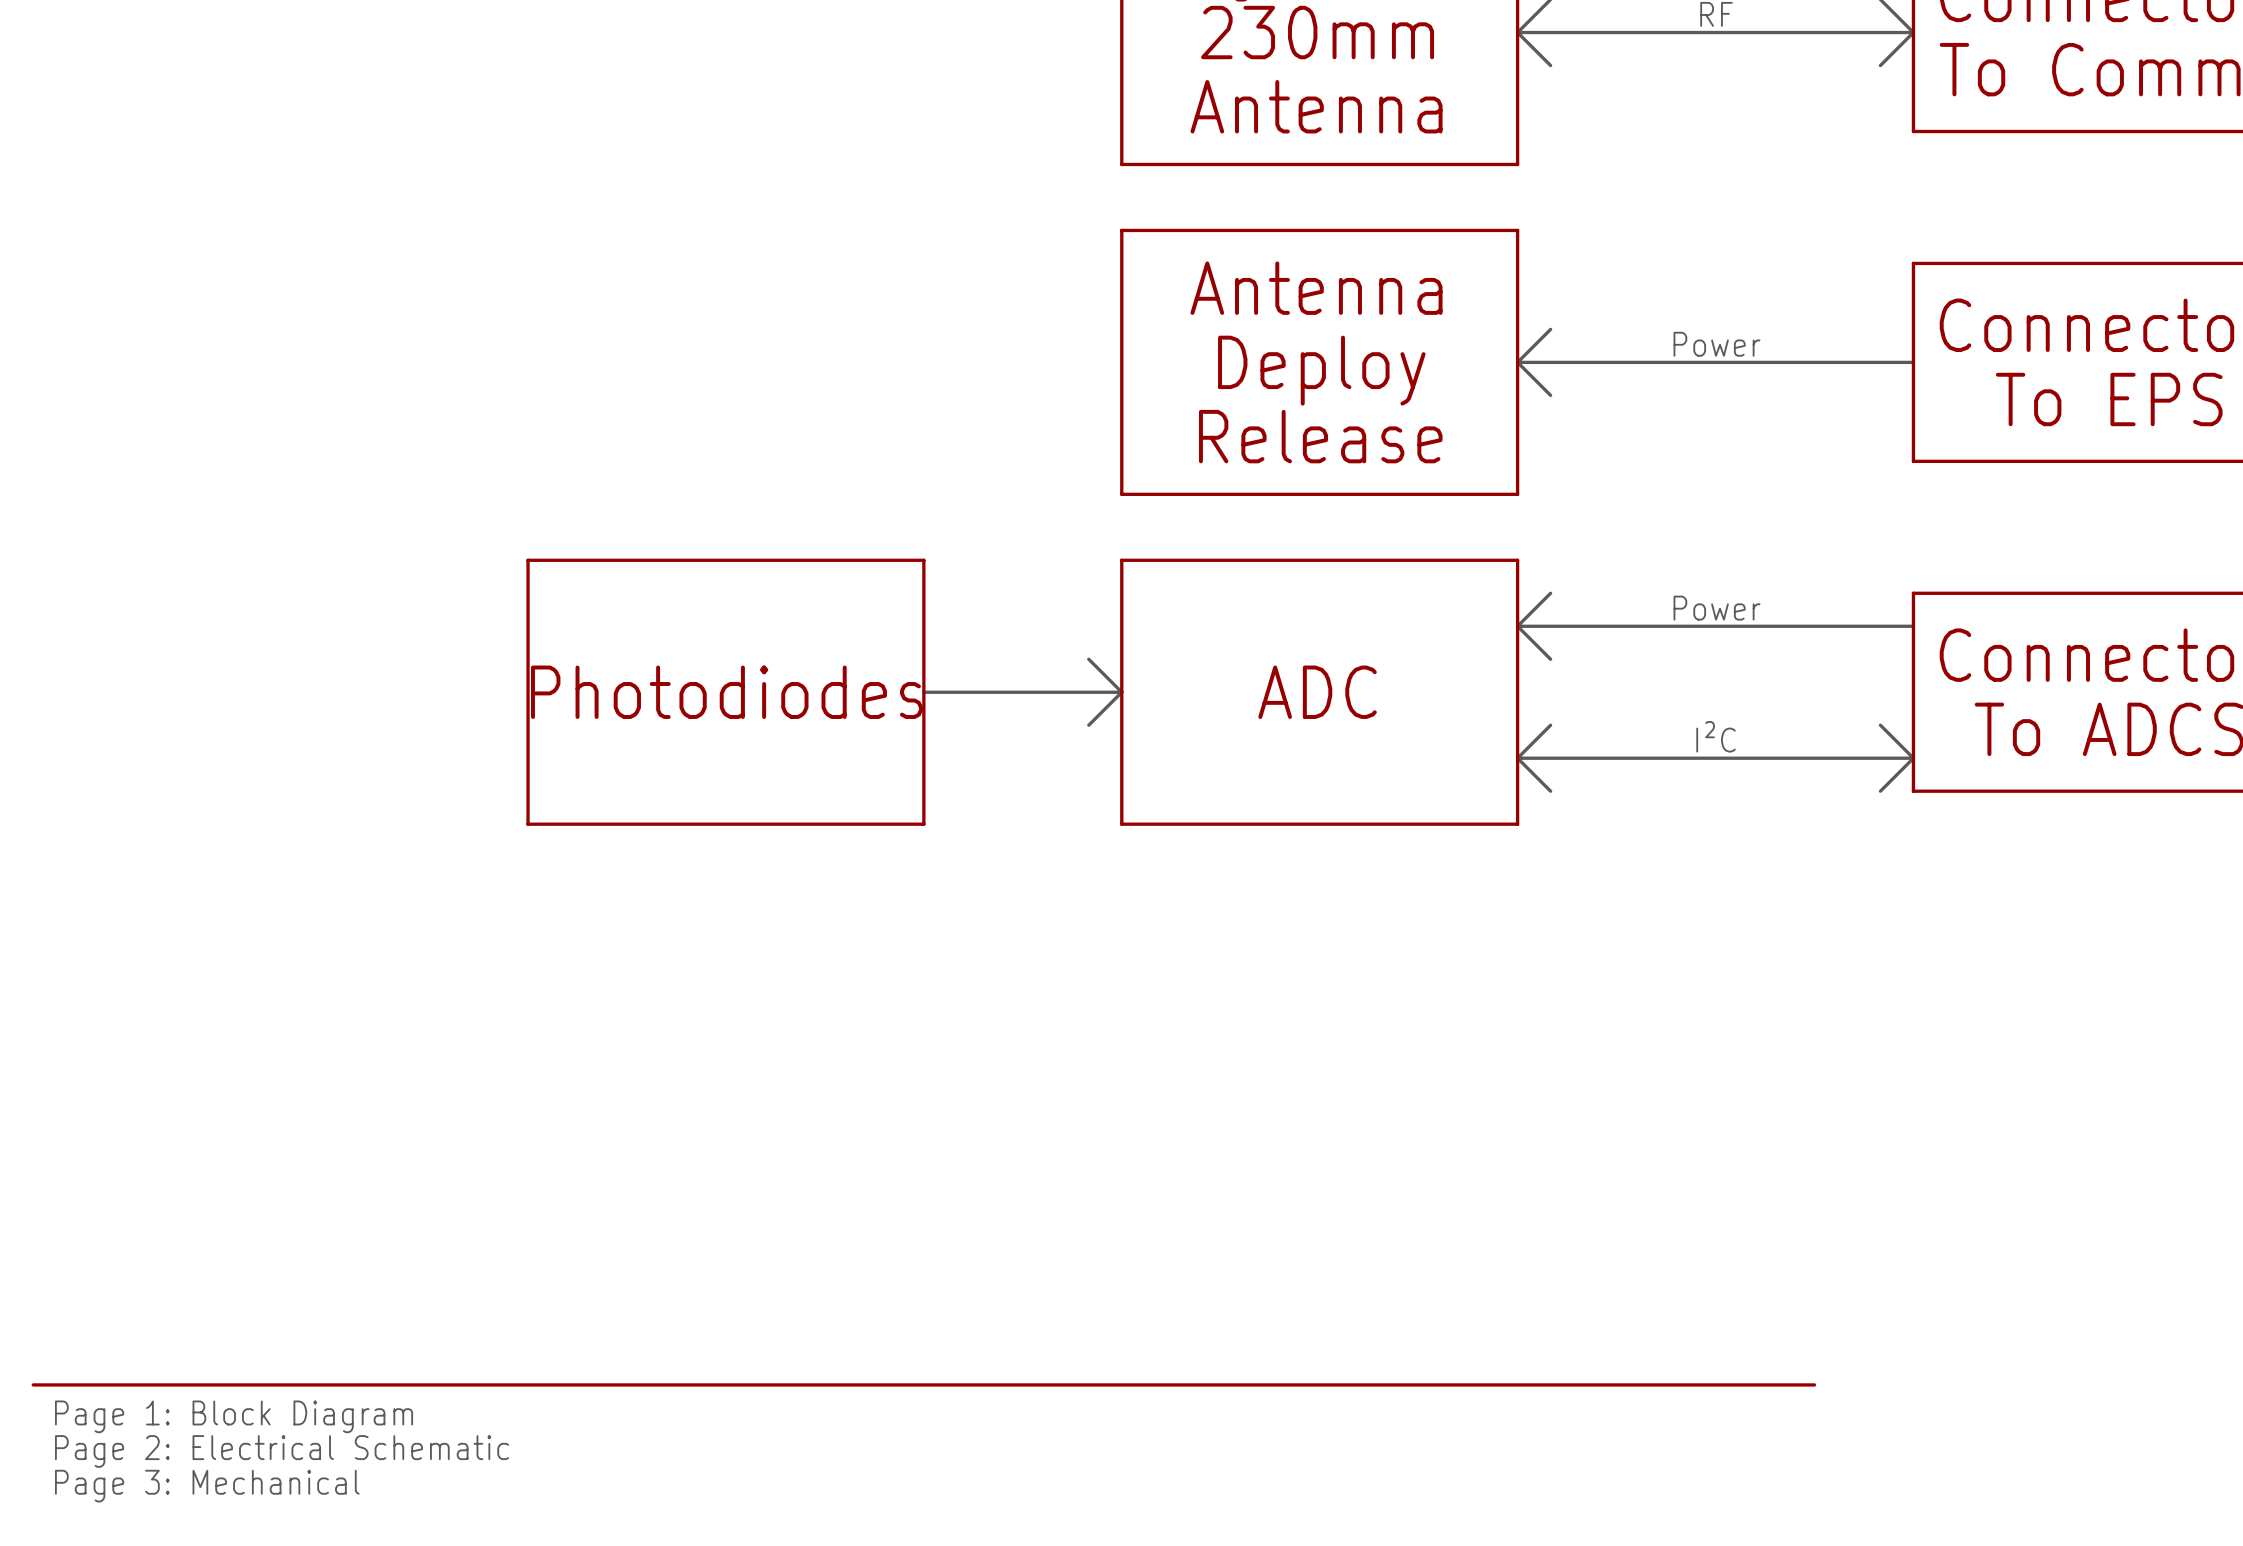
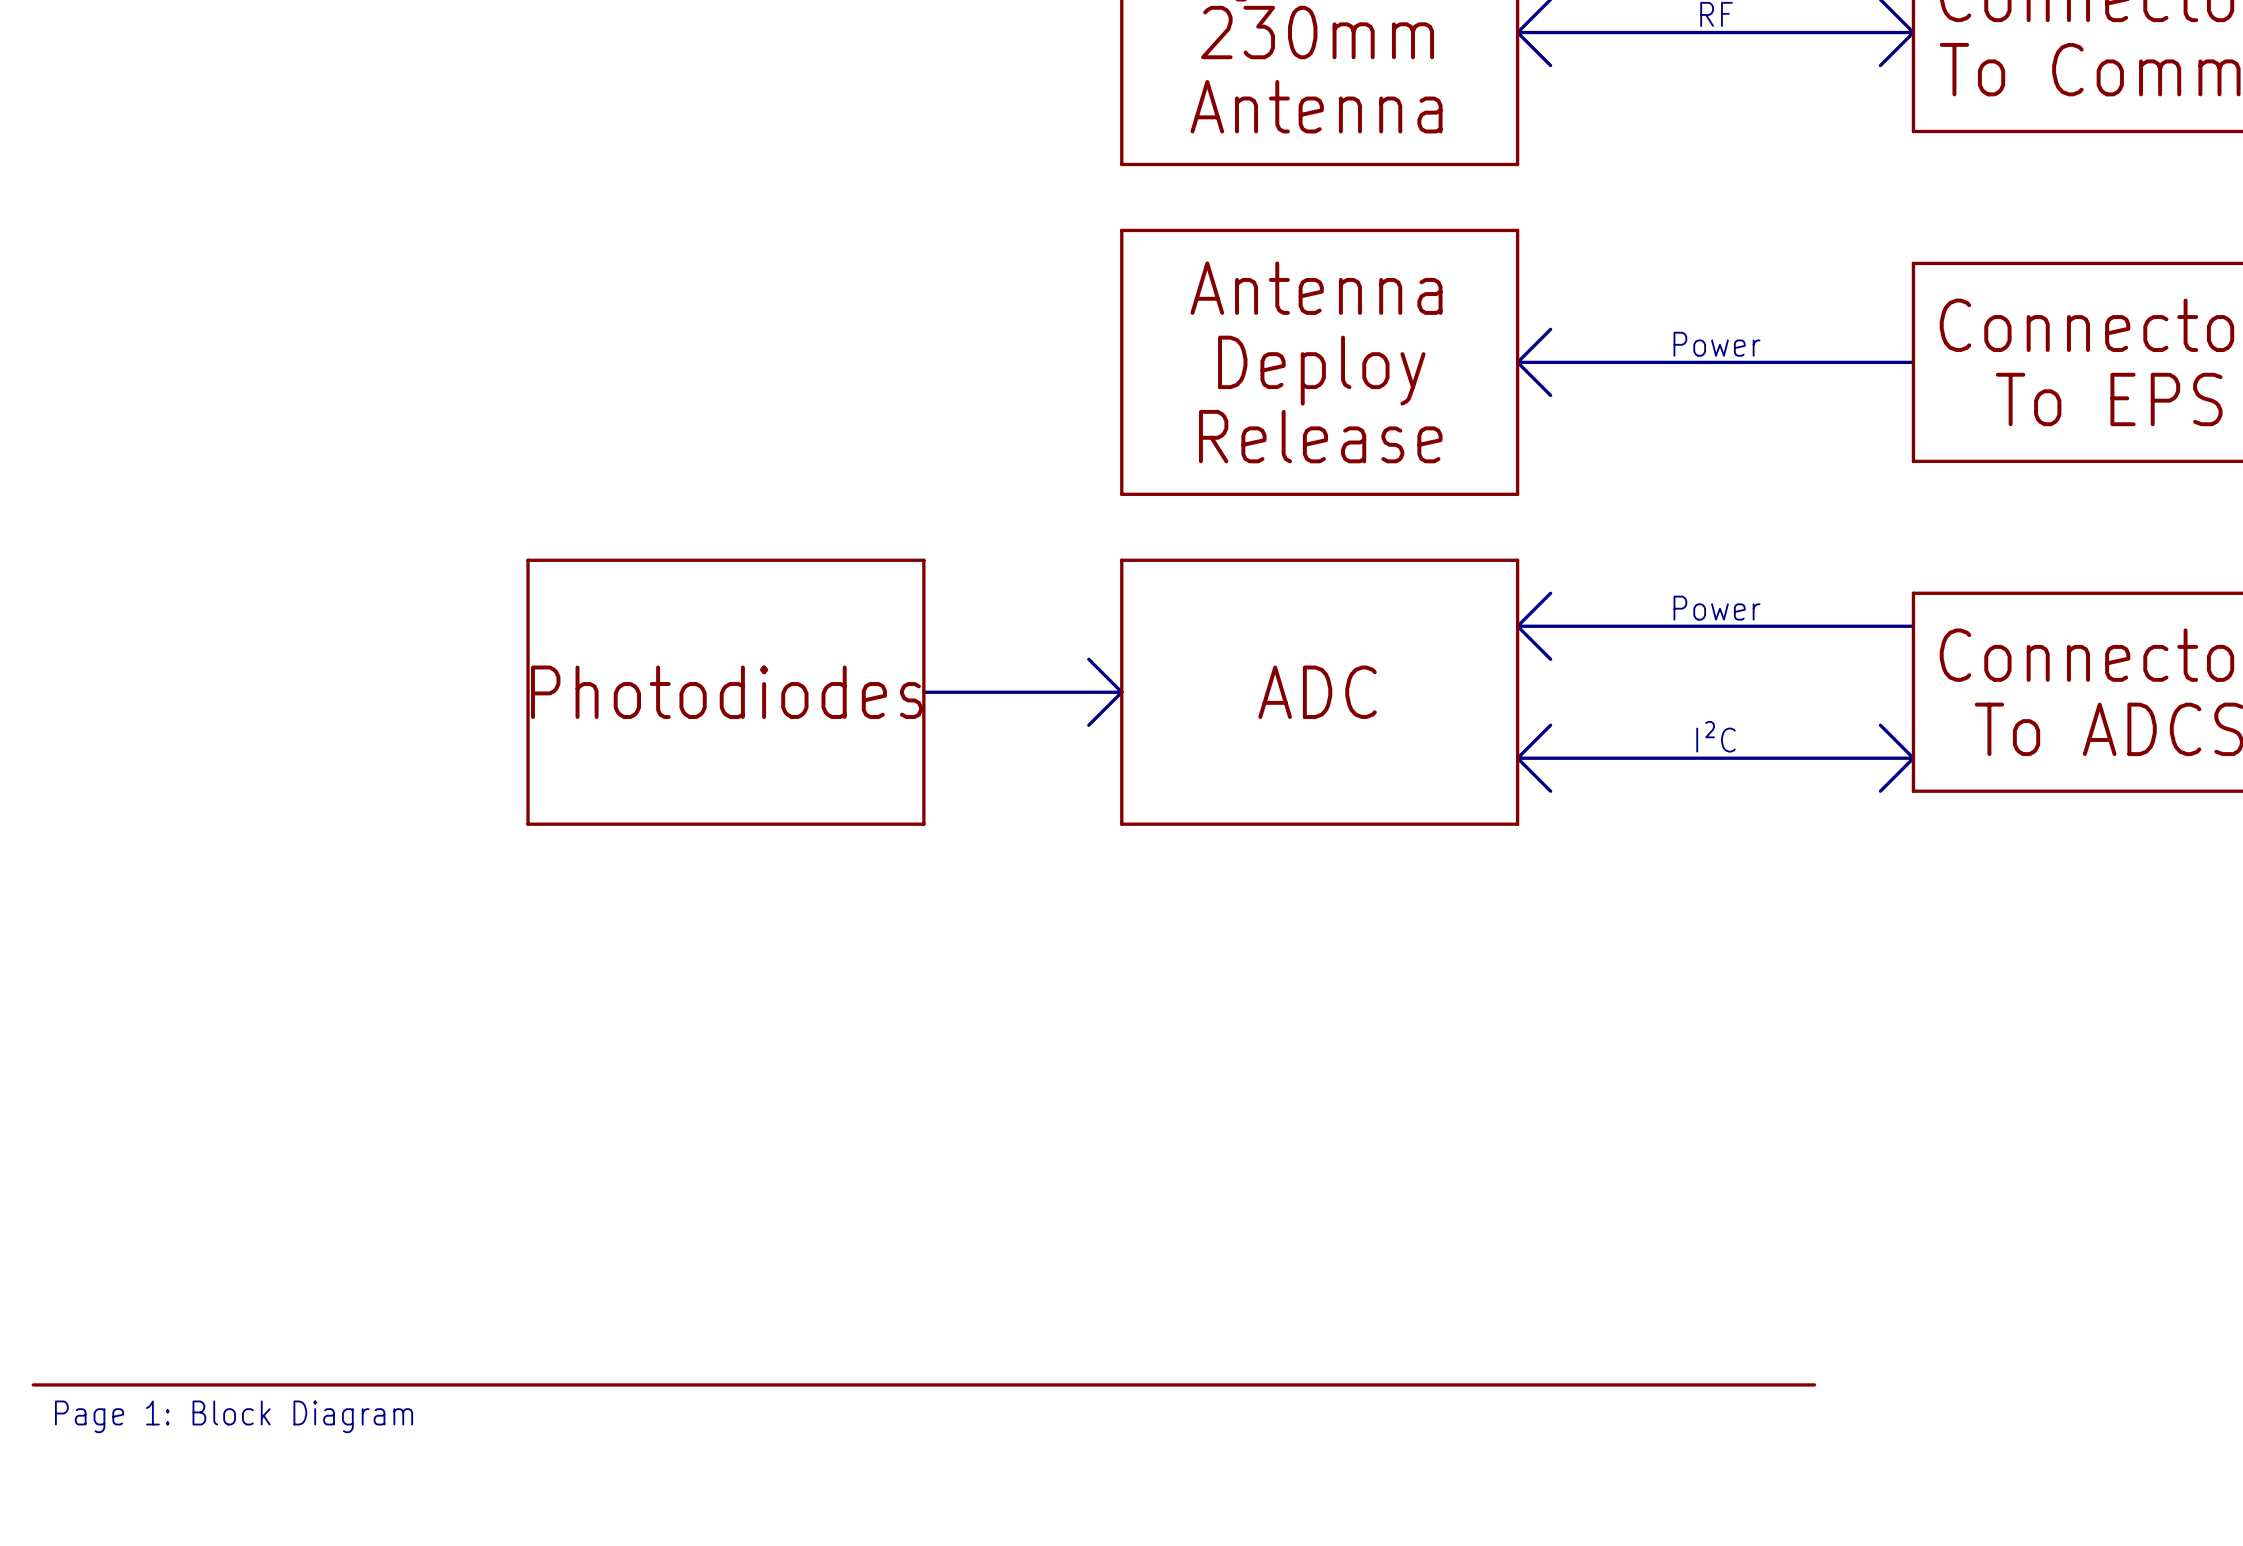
text: Page 2: Electrical Schematic (282, 1451) -> none
text: Page 3: Mechanical (207, 1486) -> none

